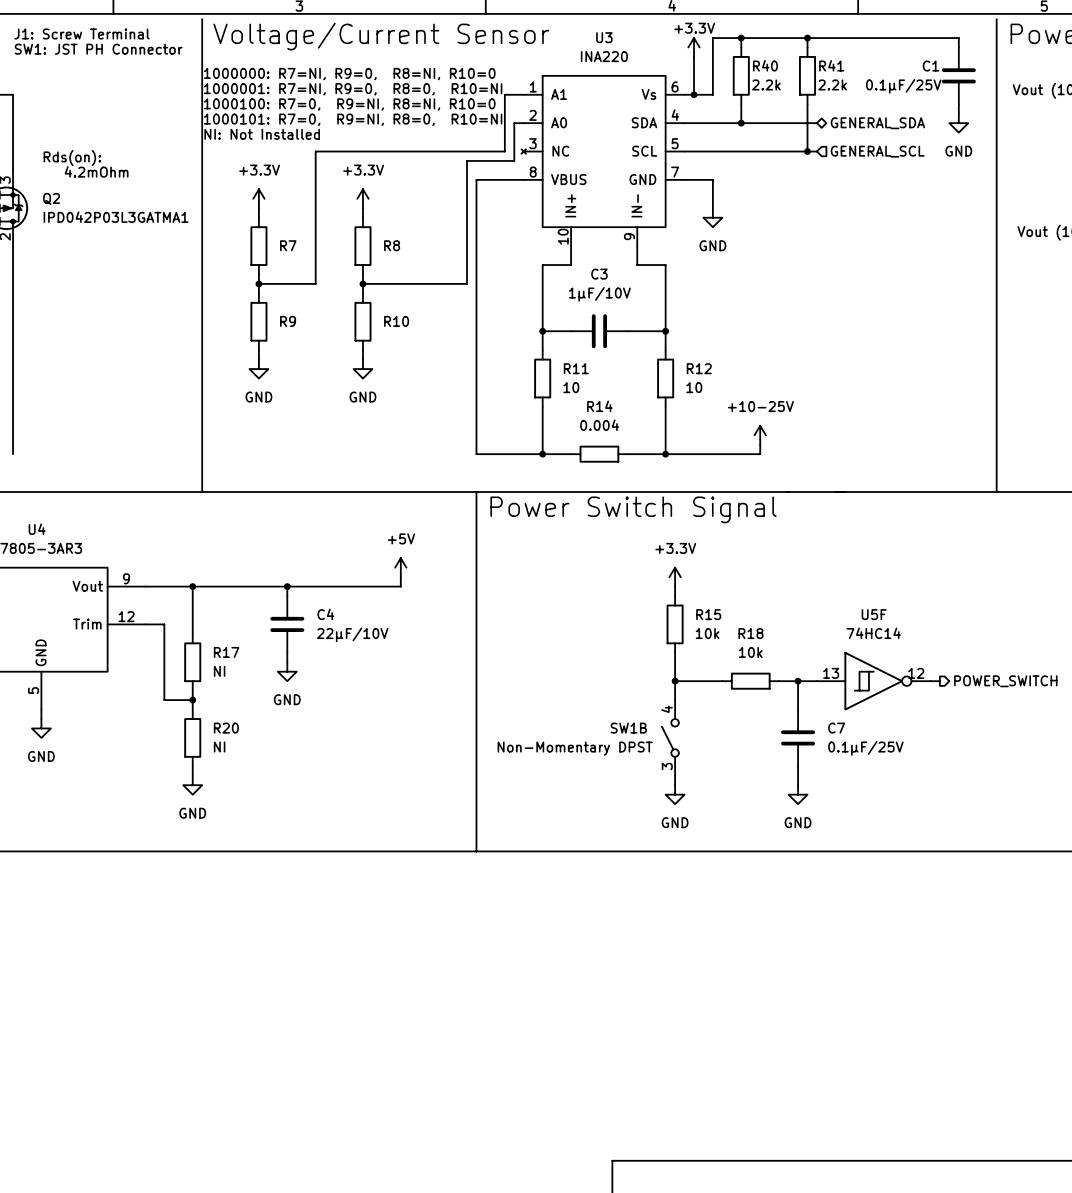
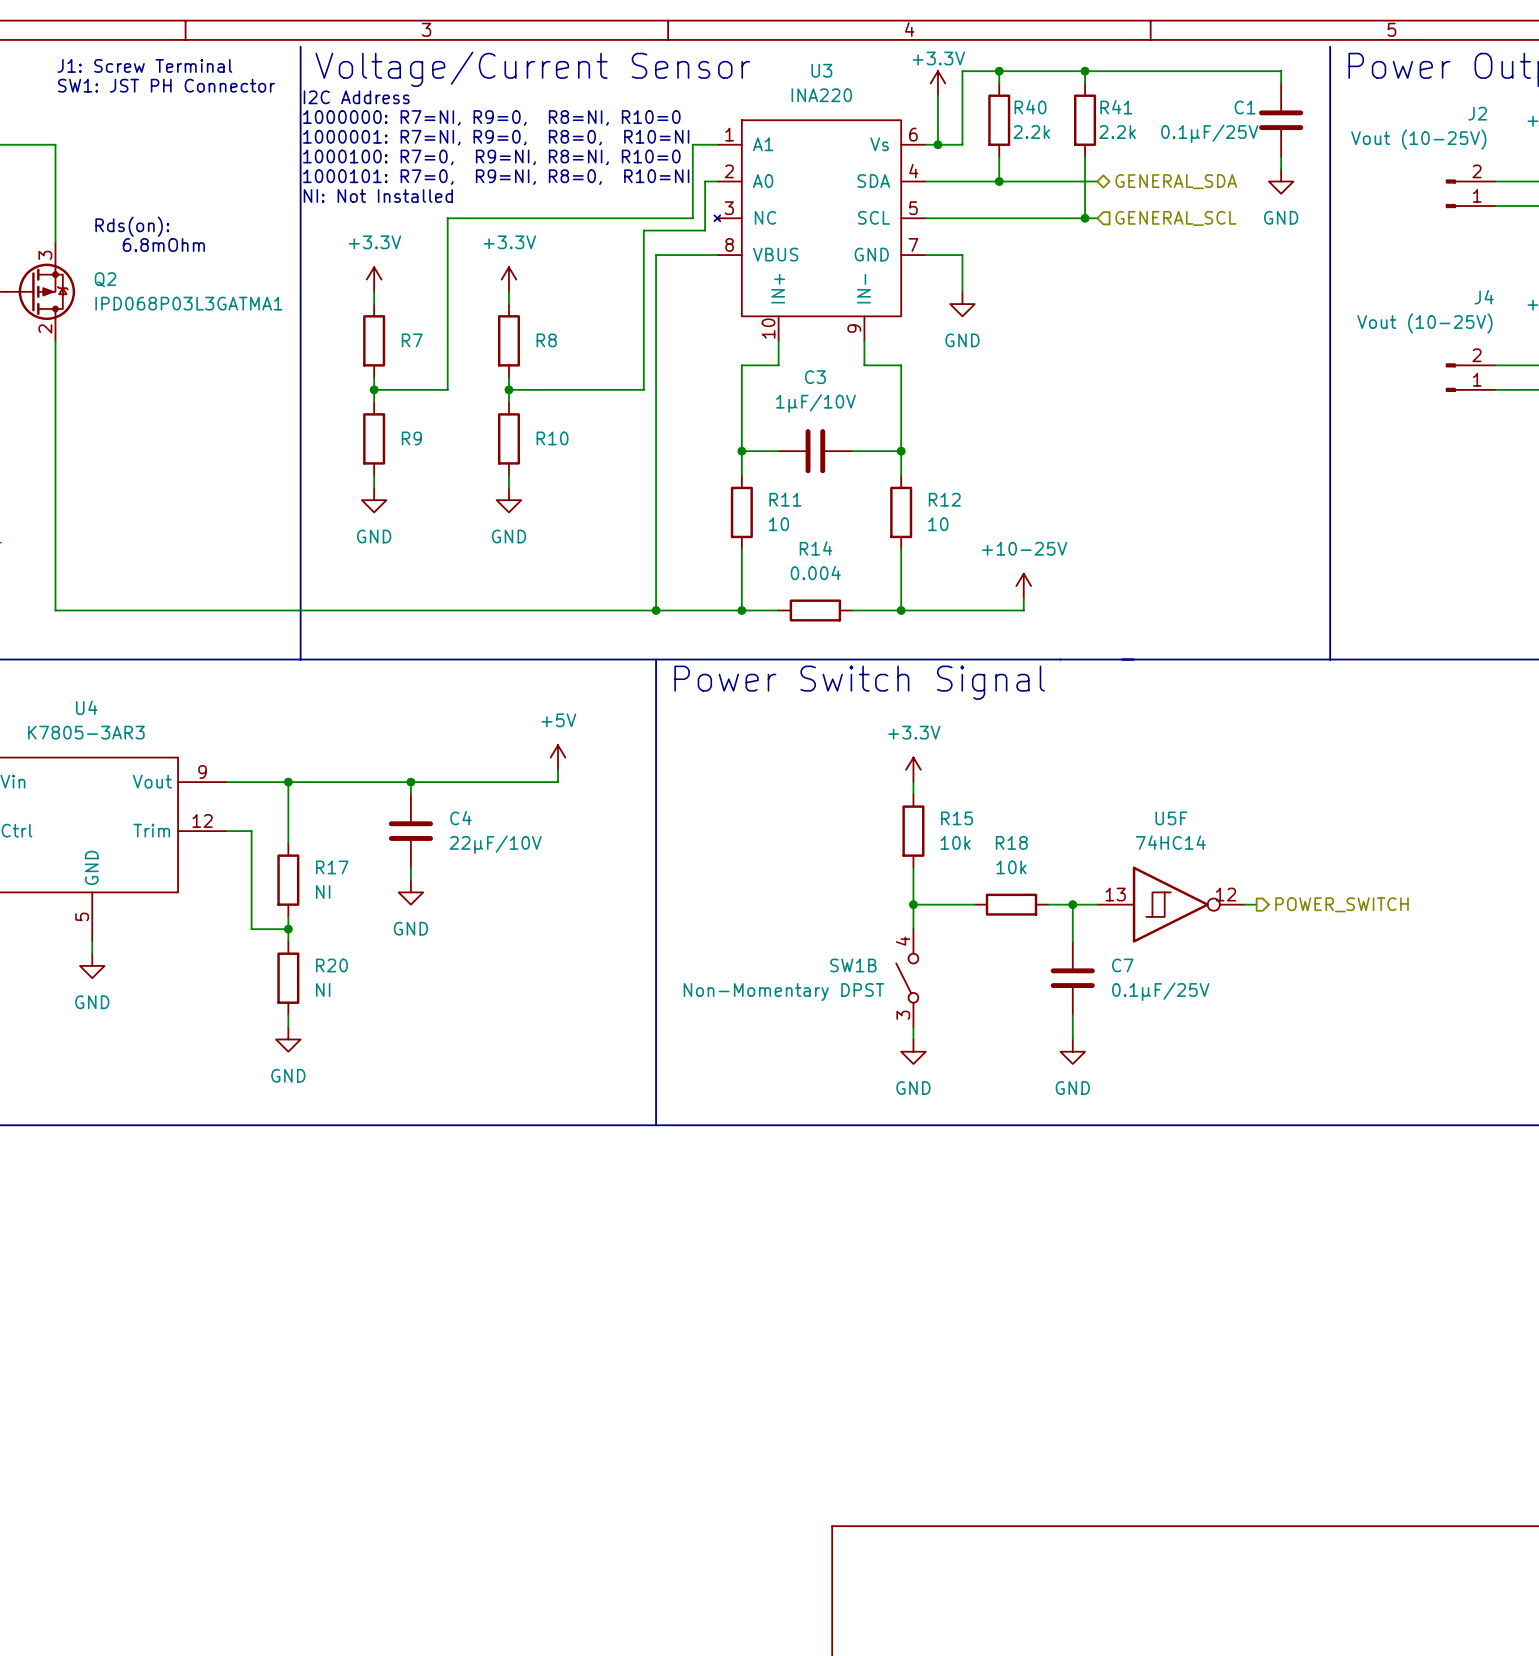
text: none -> I2C Address (356, 97)
text: 4.2mOhm (96, 171) -> 6.8mOhm (163, 245)
Q2 value: IPD042P03L3GATMA1 (116, 217) -> IPD068P03L3GATMA1 (188, 303)
wire: none -> (55, 610) (656, 610)
junction: none -> (656, 610)

